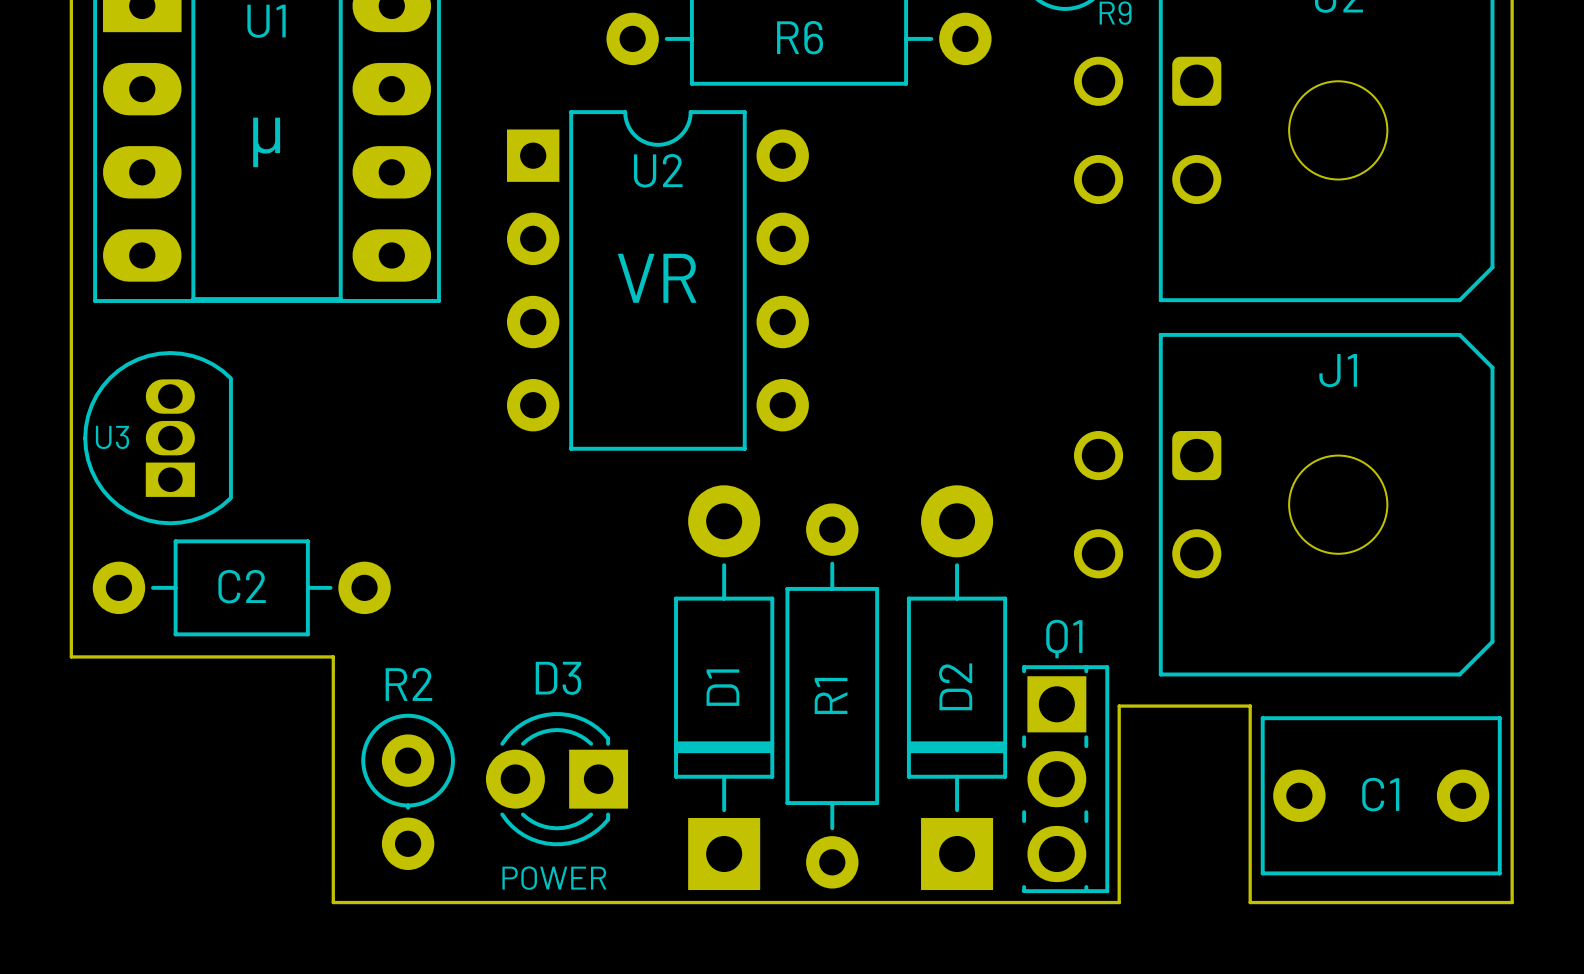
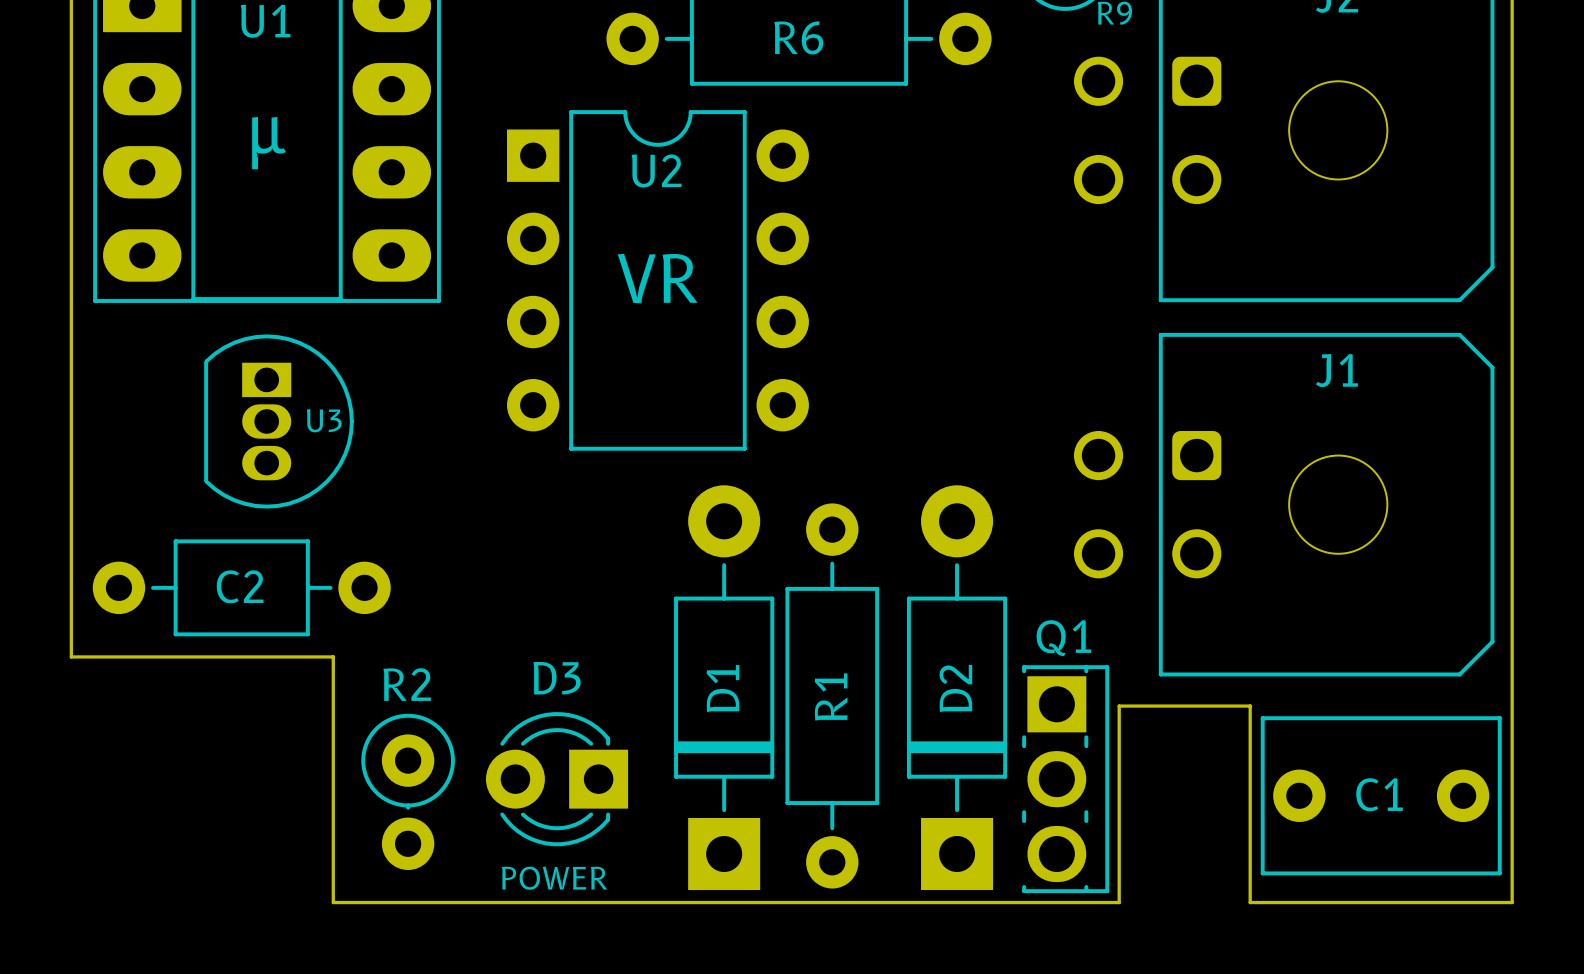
U3 rotation: 0° (158, 438) -> 180° (278, 421)
U3 position: (158, 438) -> (278, 421)

